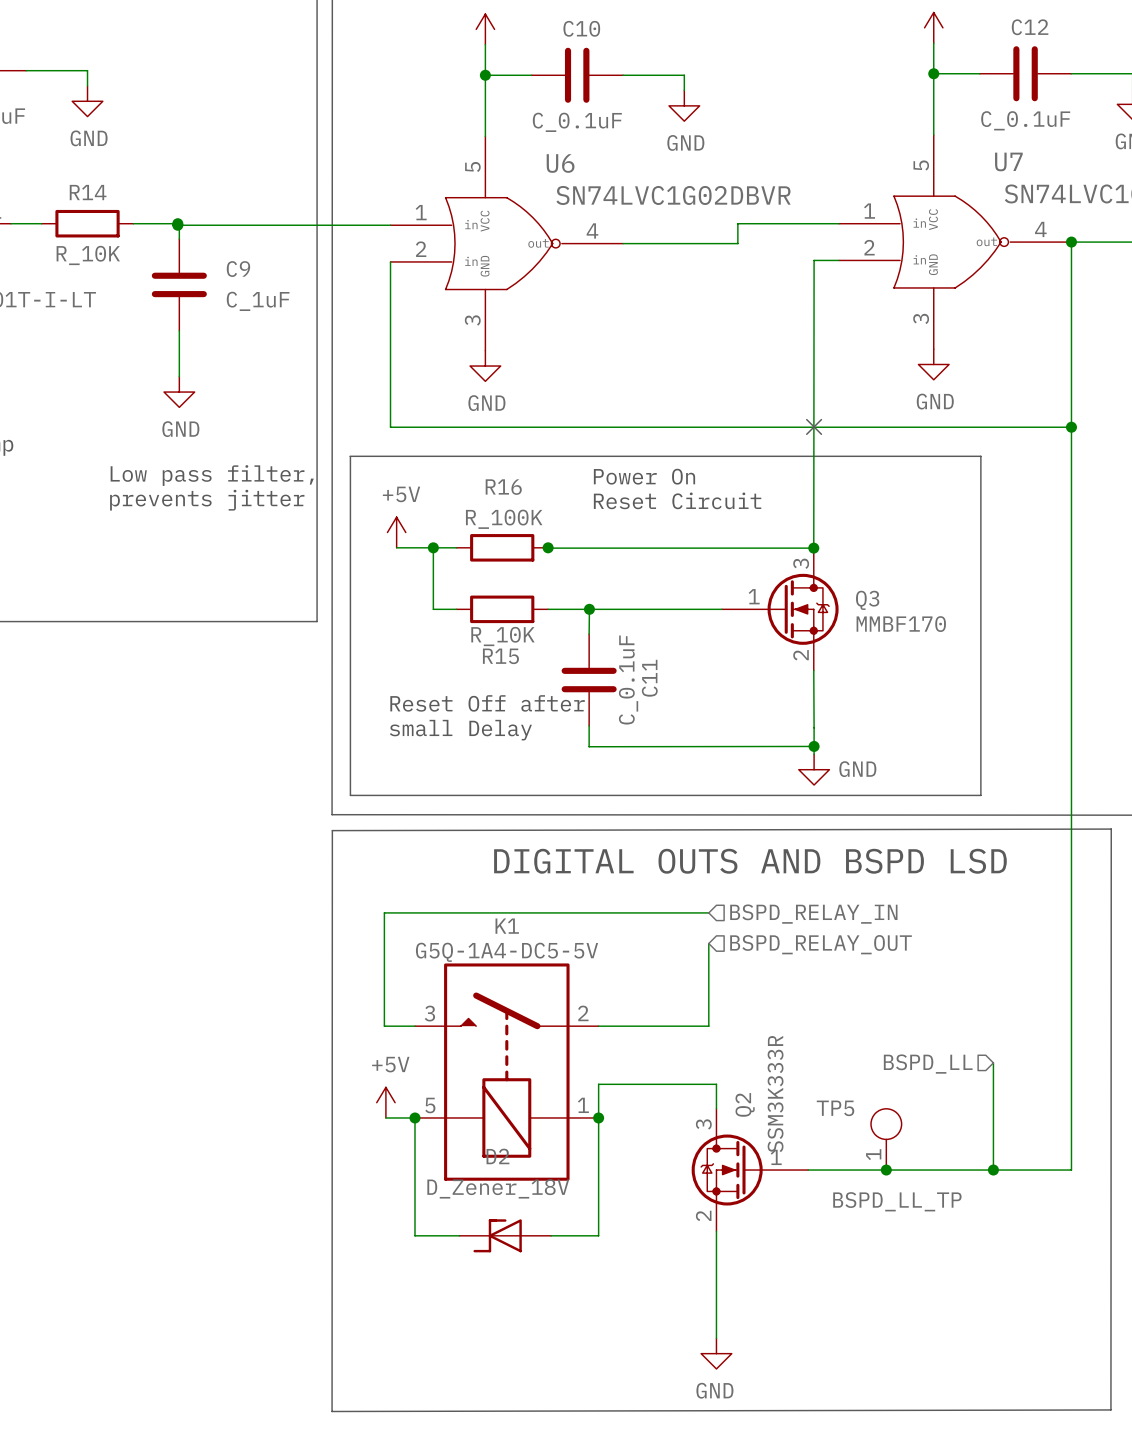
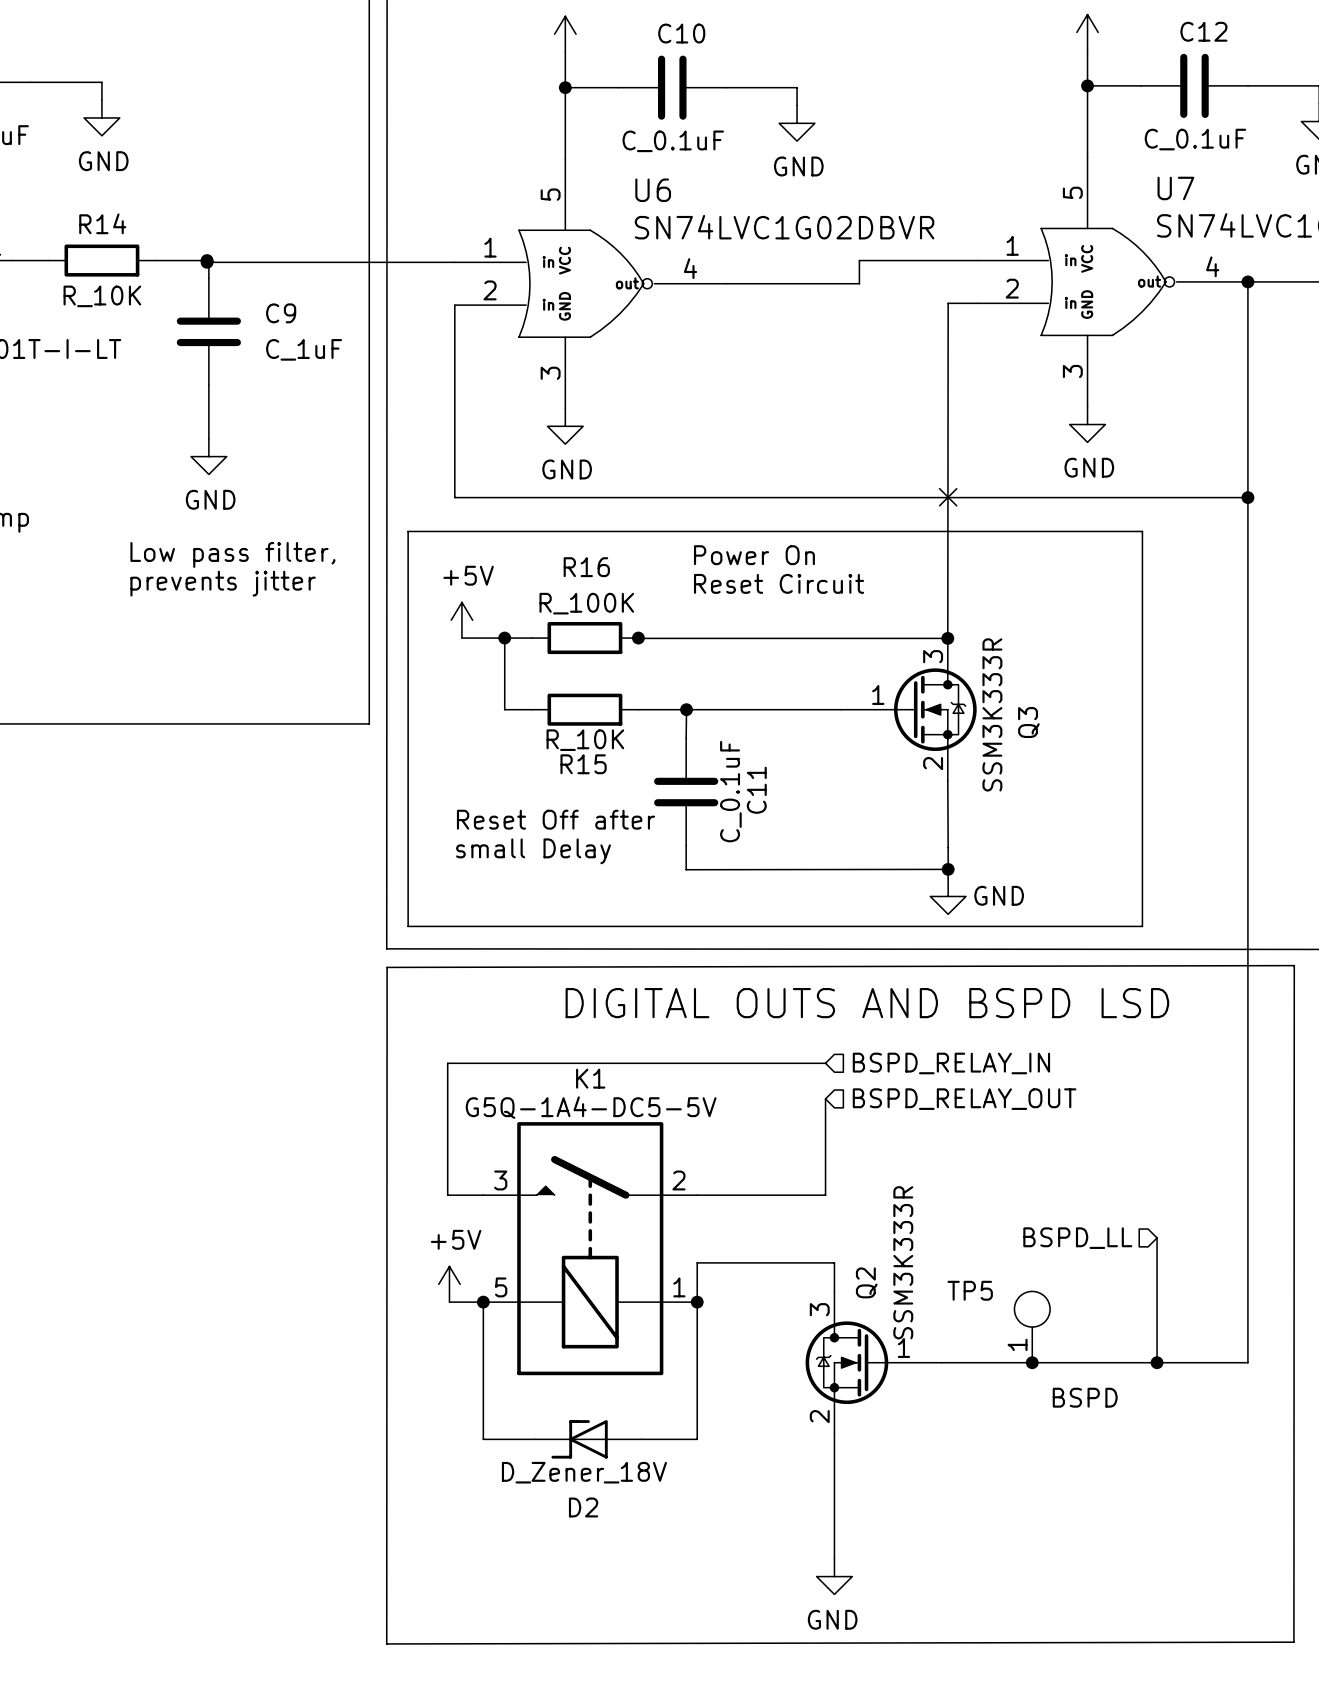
Q3 name rotation: 0° (867, 600) -> 90° counterclockwise (1028, 722)
Q3 value: MMBF170 (901, 624) -> SSM3K333R (992, 714)
D2 name position: D2 (497, 1156) -> D2 (583, 1507)
D2 value position: D_Zener_18V (498, 1188) -> D_Zener_18V (584, 1472)
TP5 value: BSPD_LL_TP (897, 1201) -> BSPD (1085, 1397)

